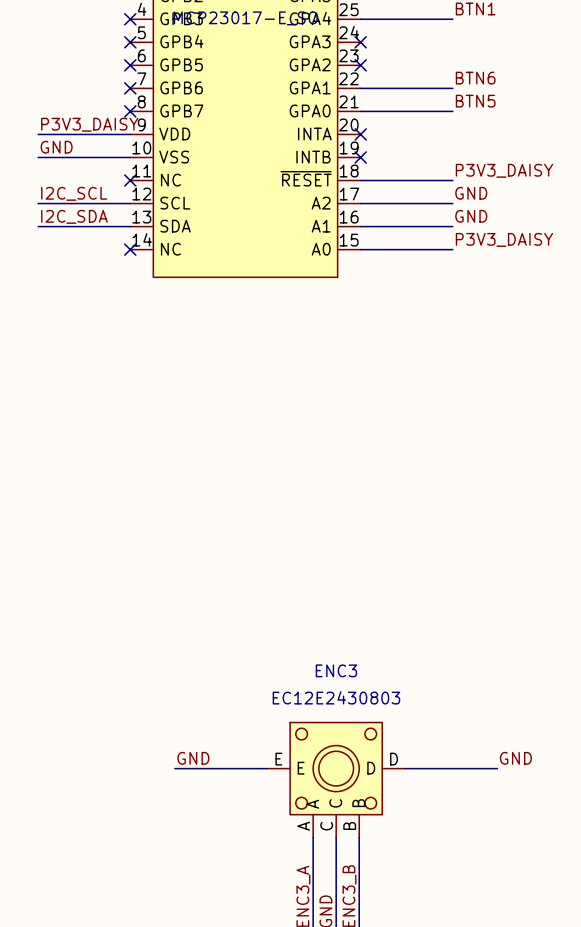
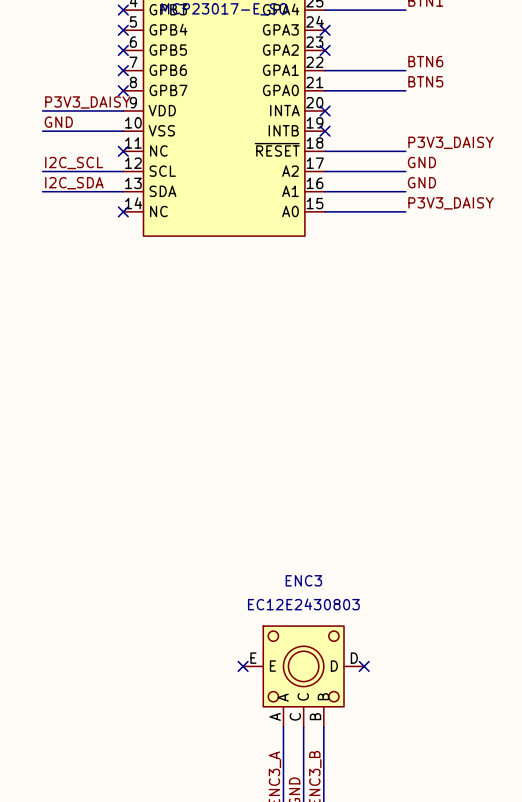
label: GND (193, 758) -> none
label: GND (515, 758) -> none
wire: (174, 768) (267, 768) -> none
no-connect mark: none -> (243, 666)
wire: (405, 768) (497, 768) -> none
no-connect mark: none -> (364, 666)

